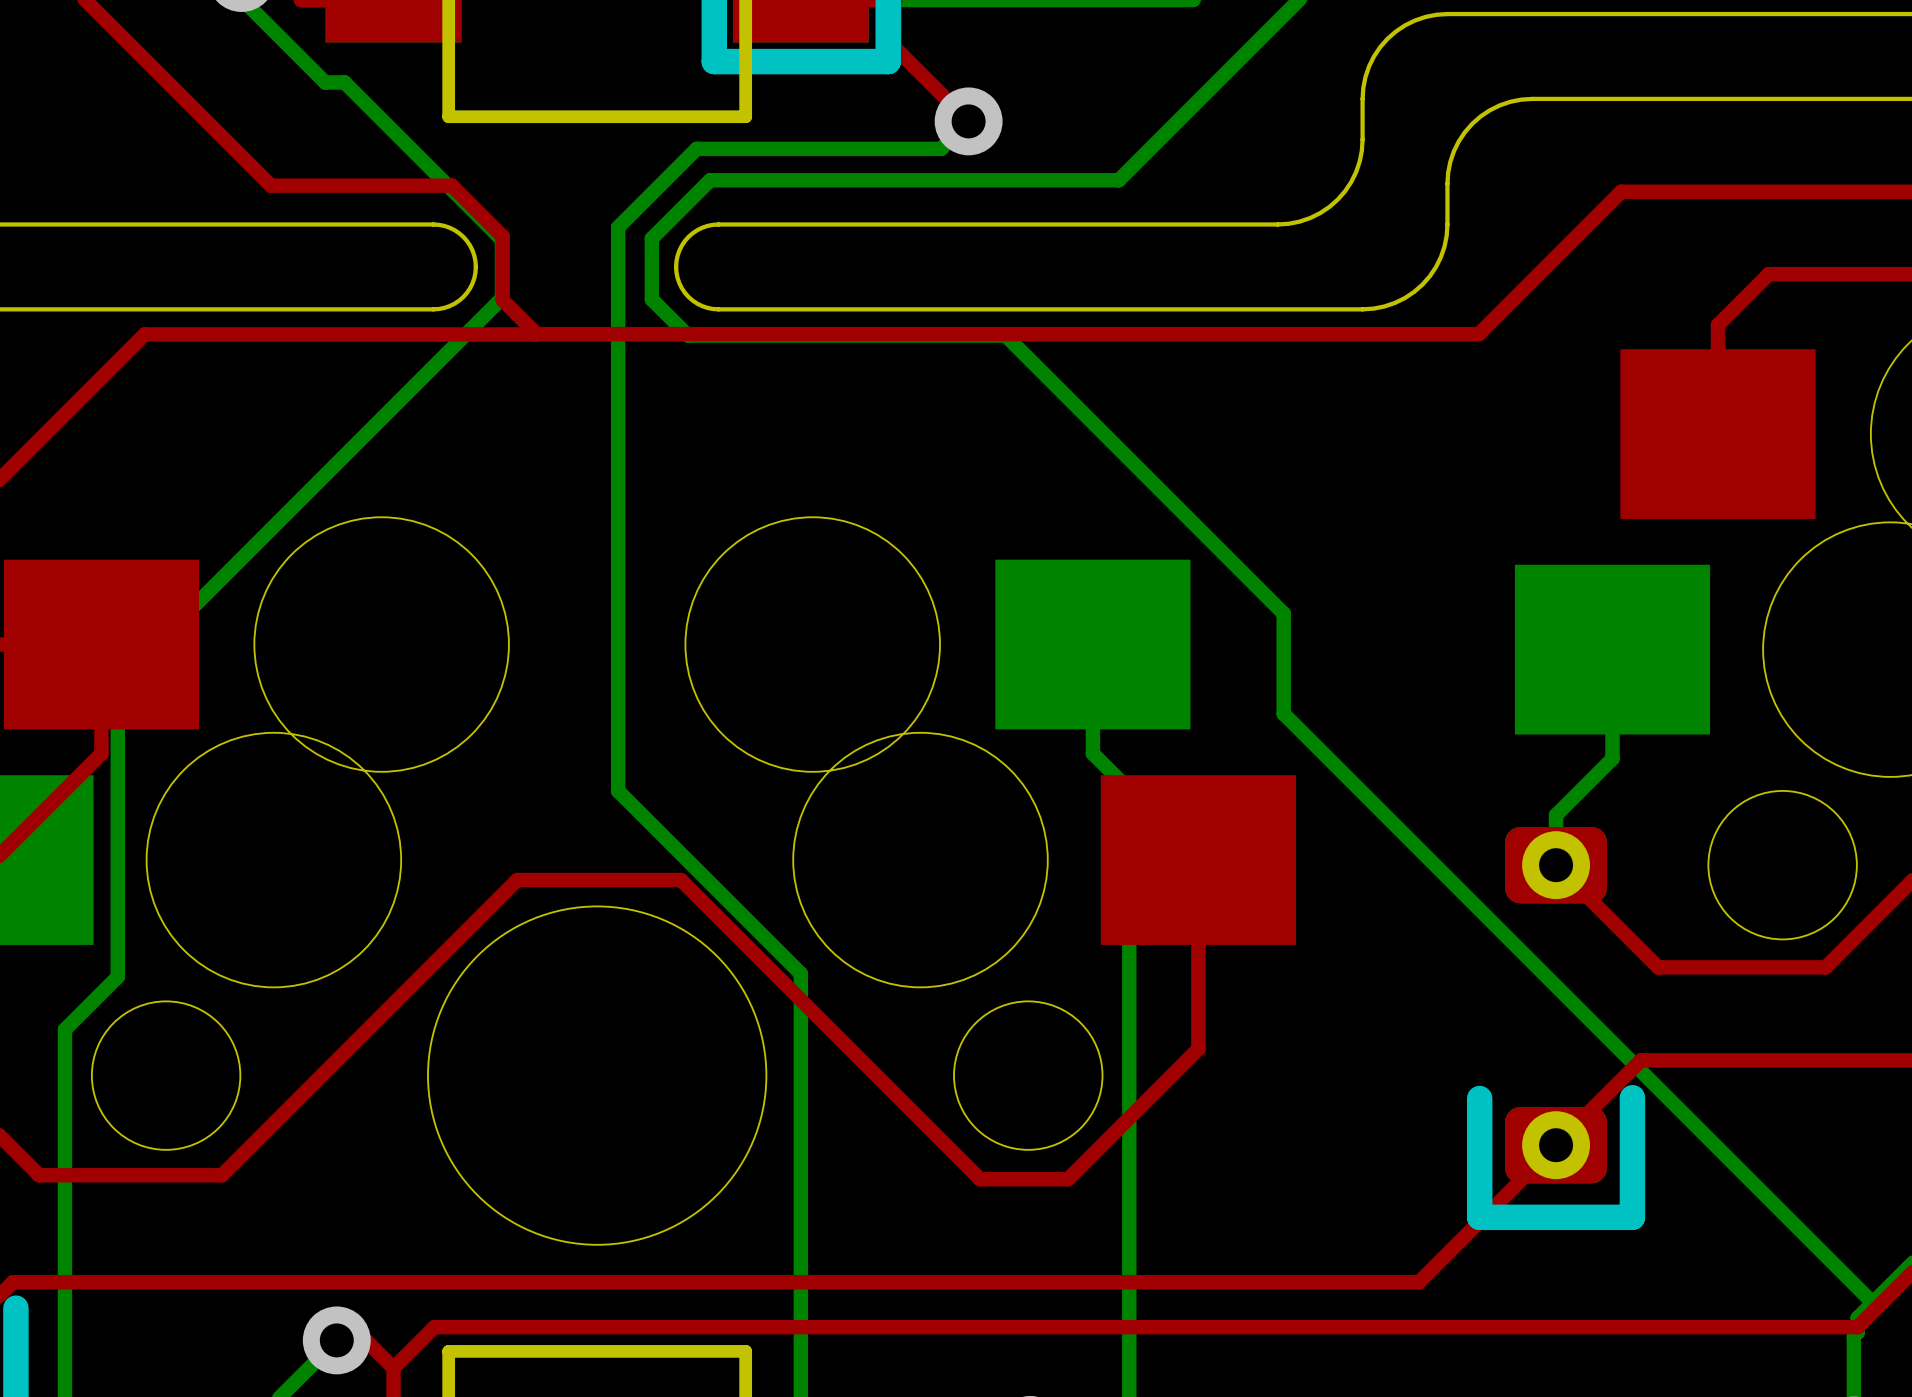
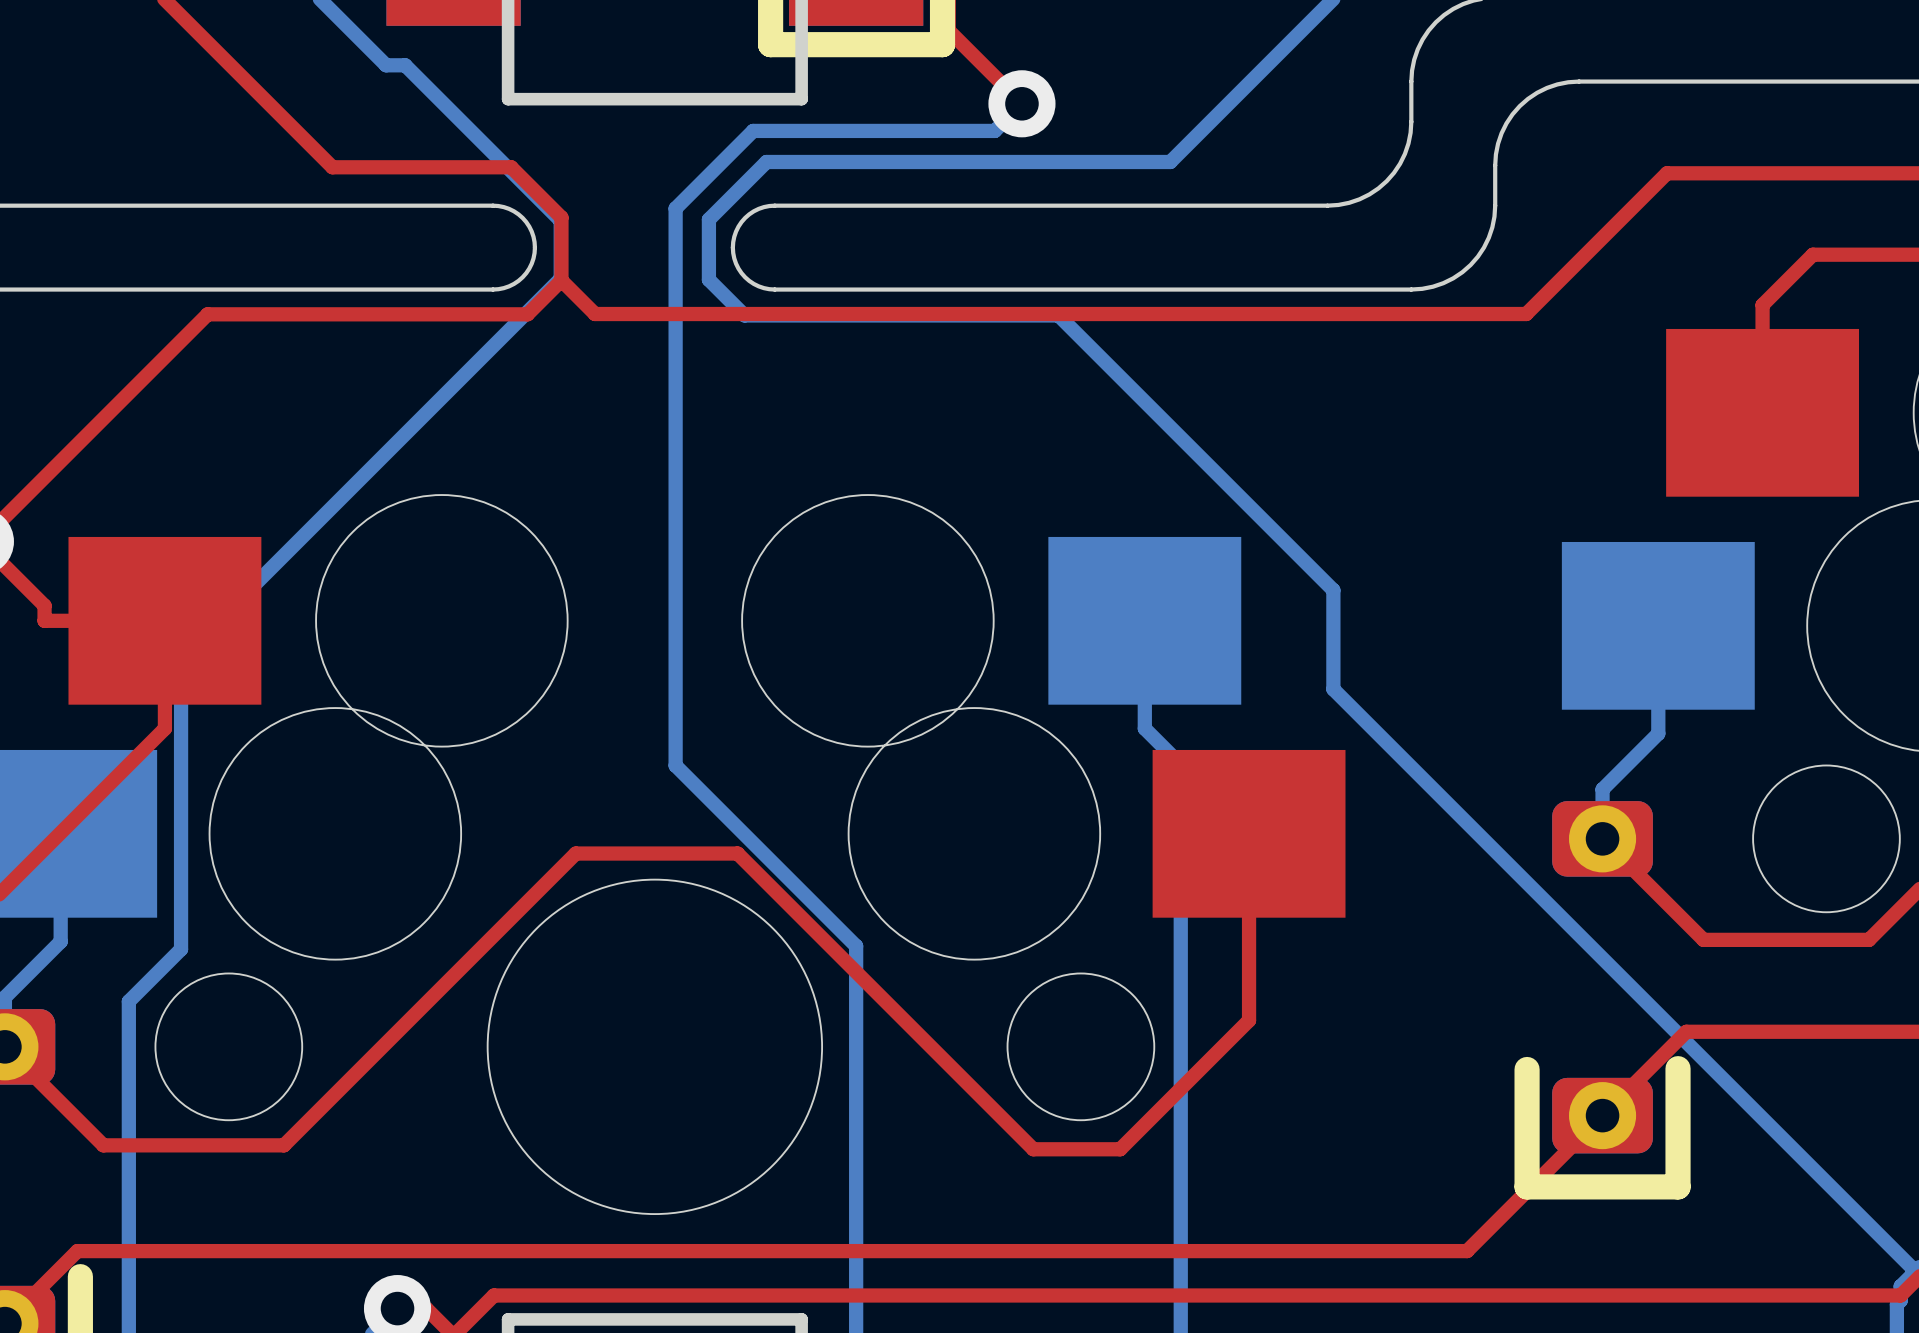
top track: (468, 334) (536, 334) -> (527, 314) (561, 280)

